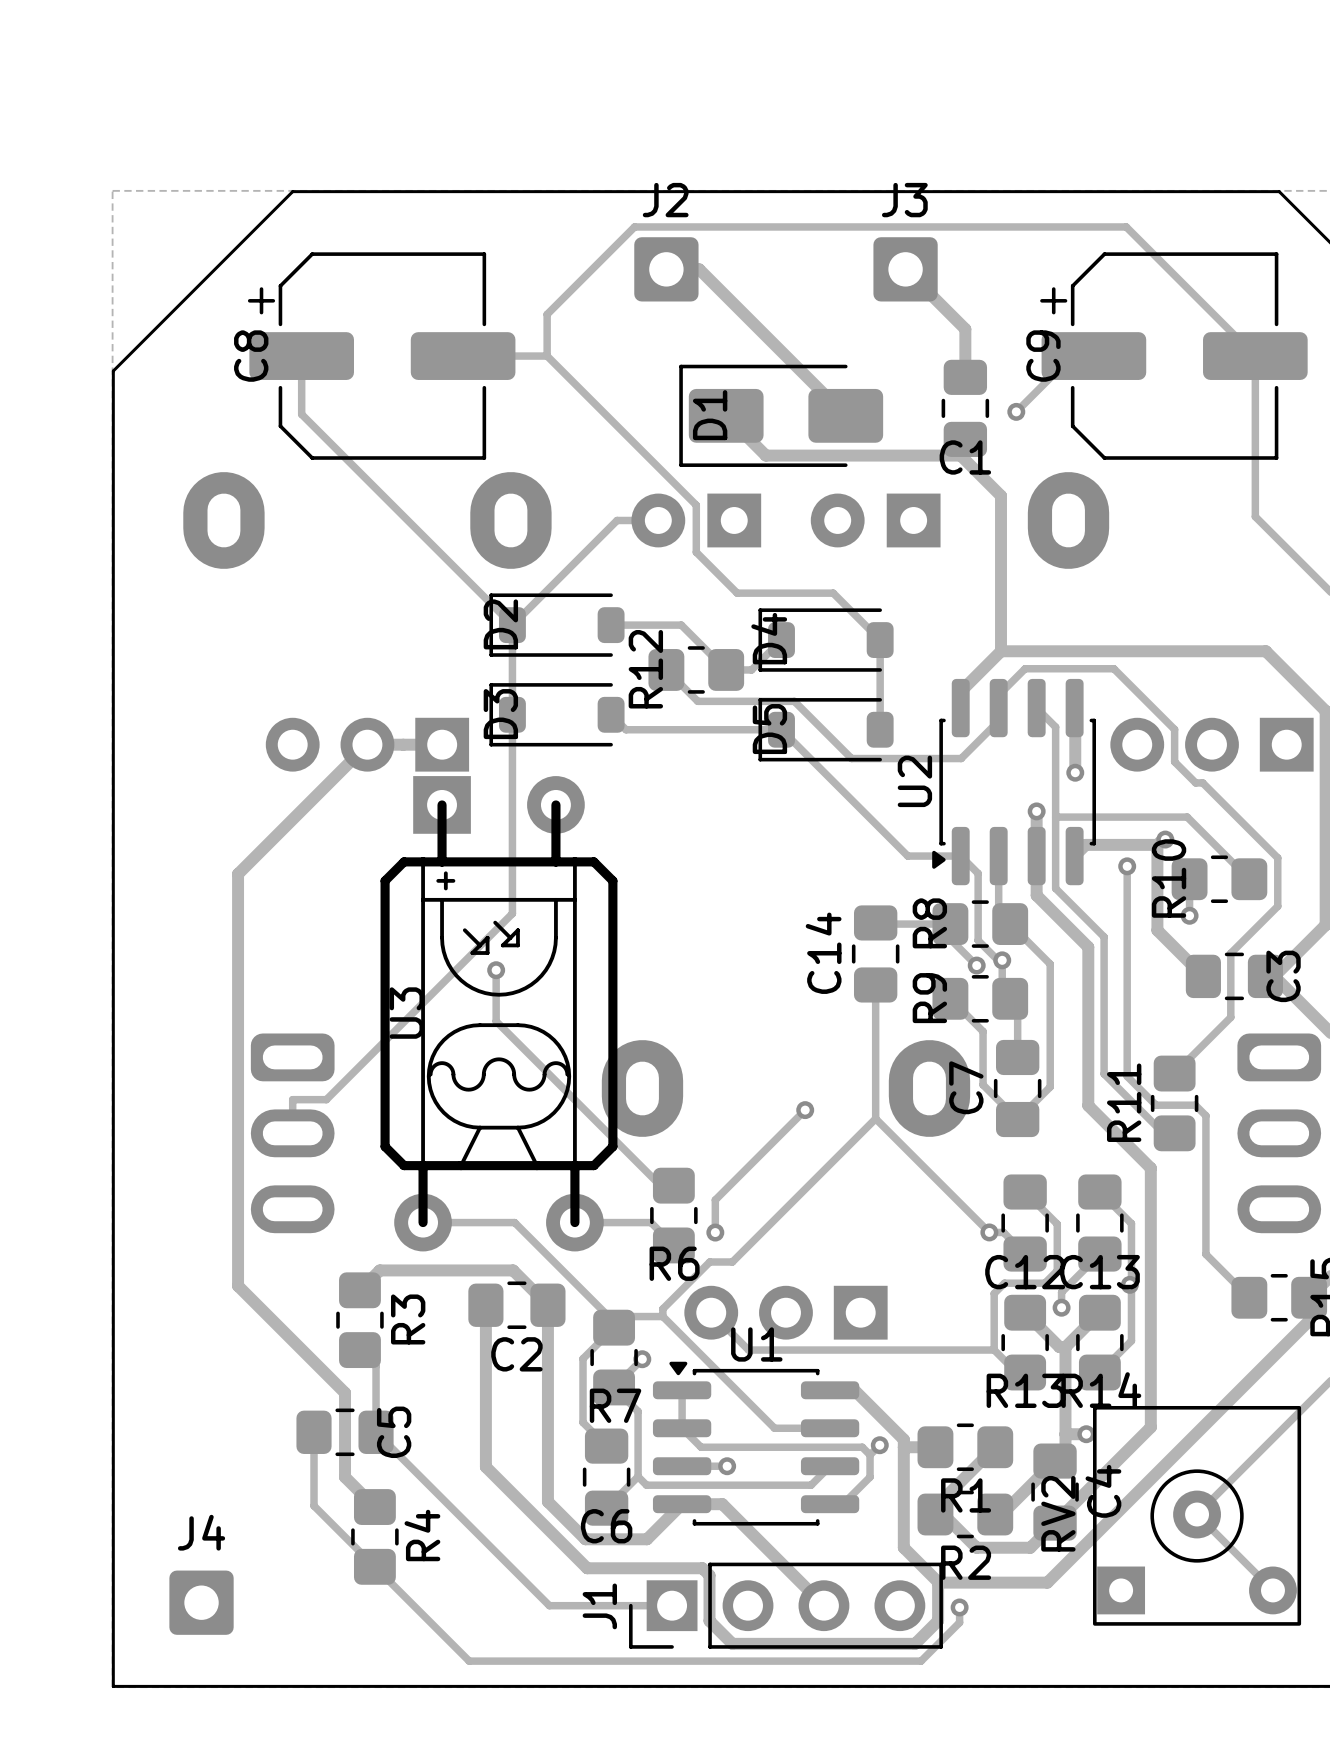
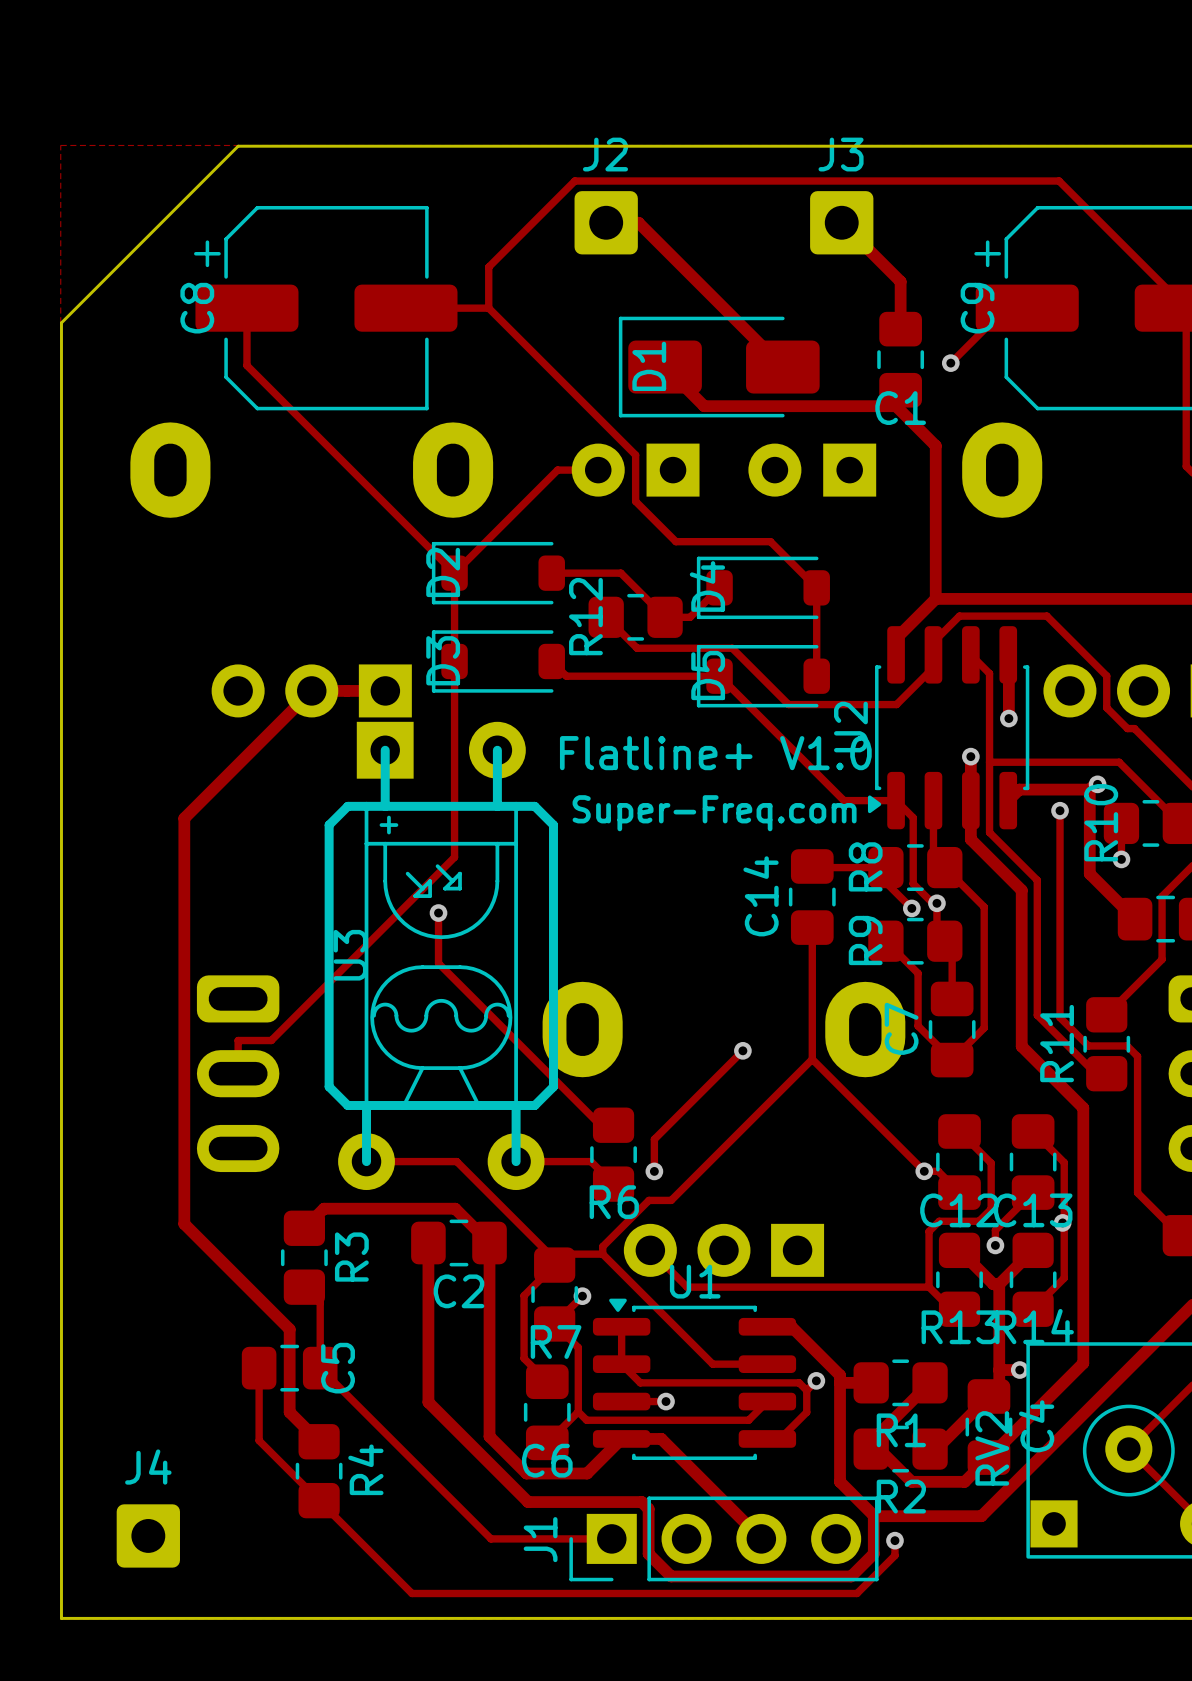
text: none -> Flatline+ V1.0 (715, 753)
text: none -> Super-Freq.com (714, 813)

